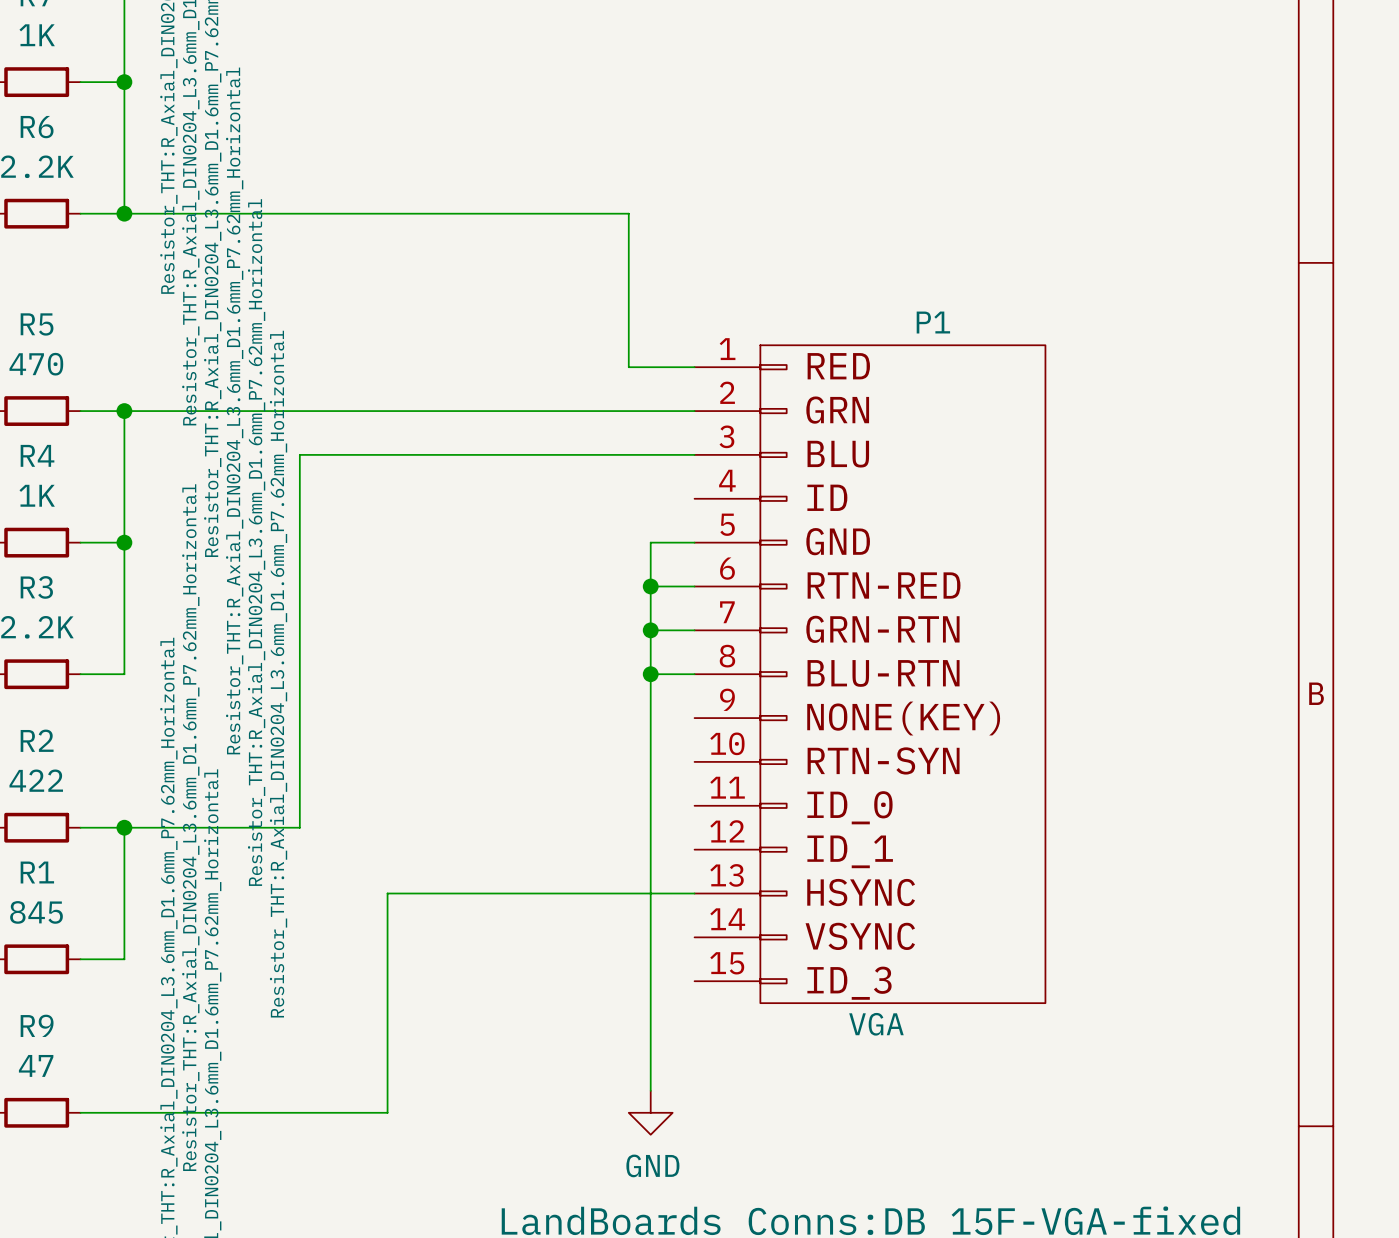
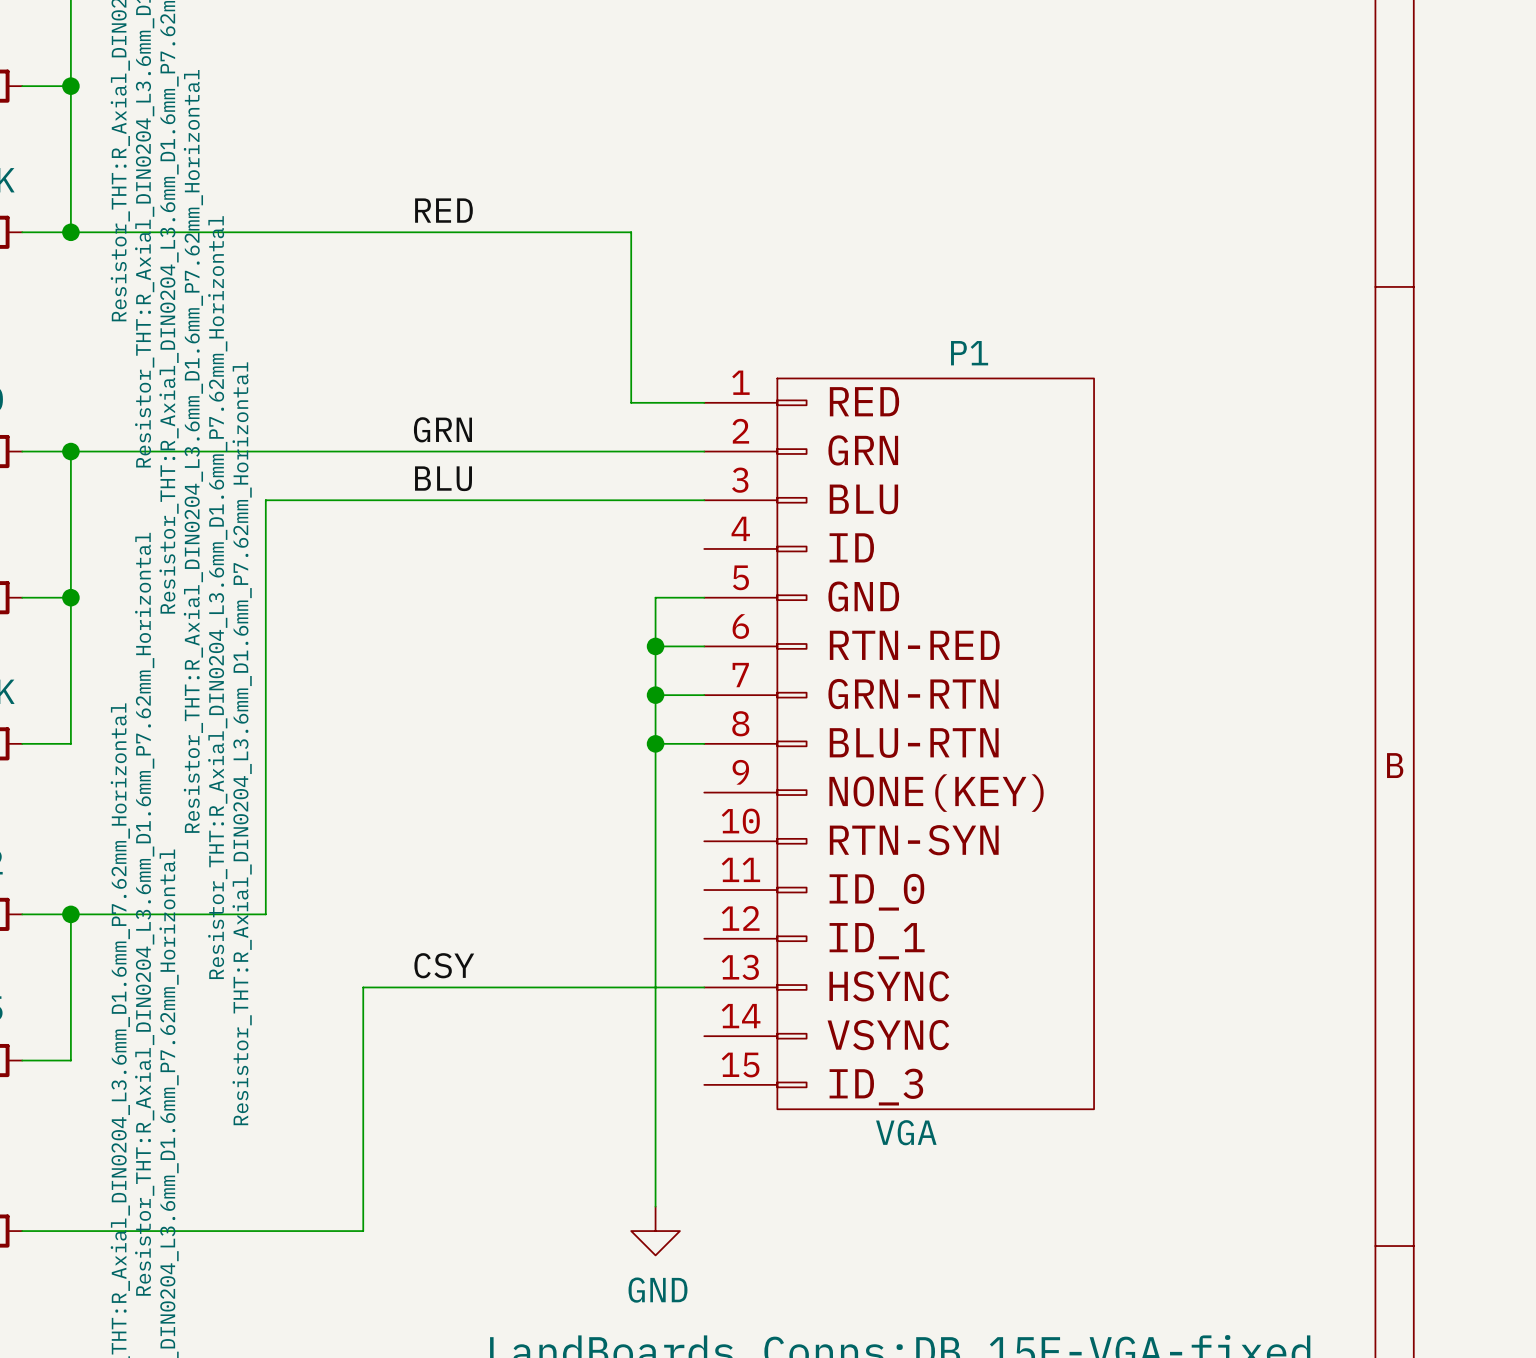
label: none -> RED (443, 210)
label: none -> GRN (442, 429)
label: none -> BLU (443, 478)
label: none -> CSY (444, 965)

